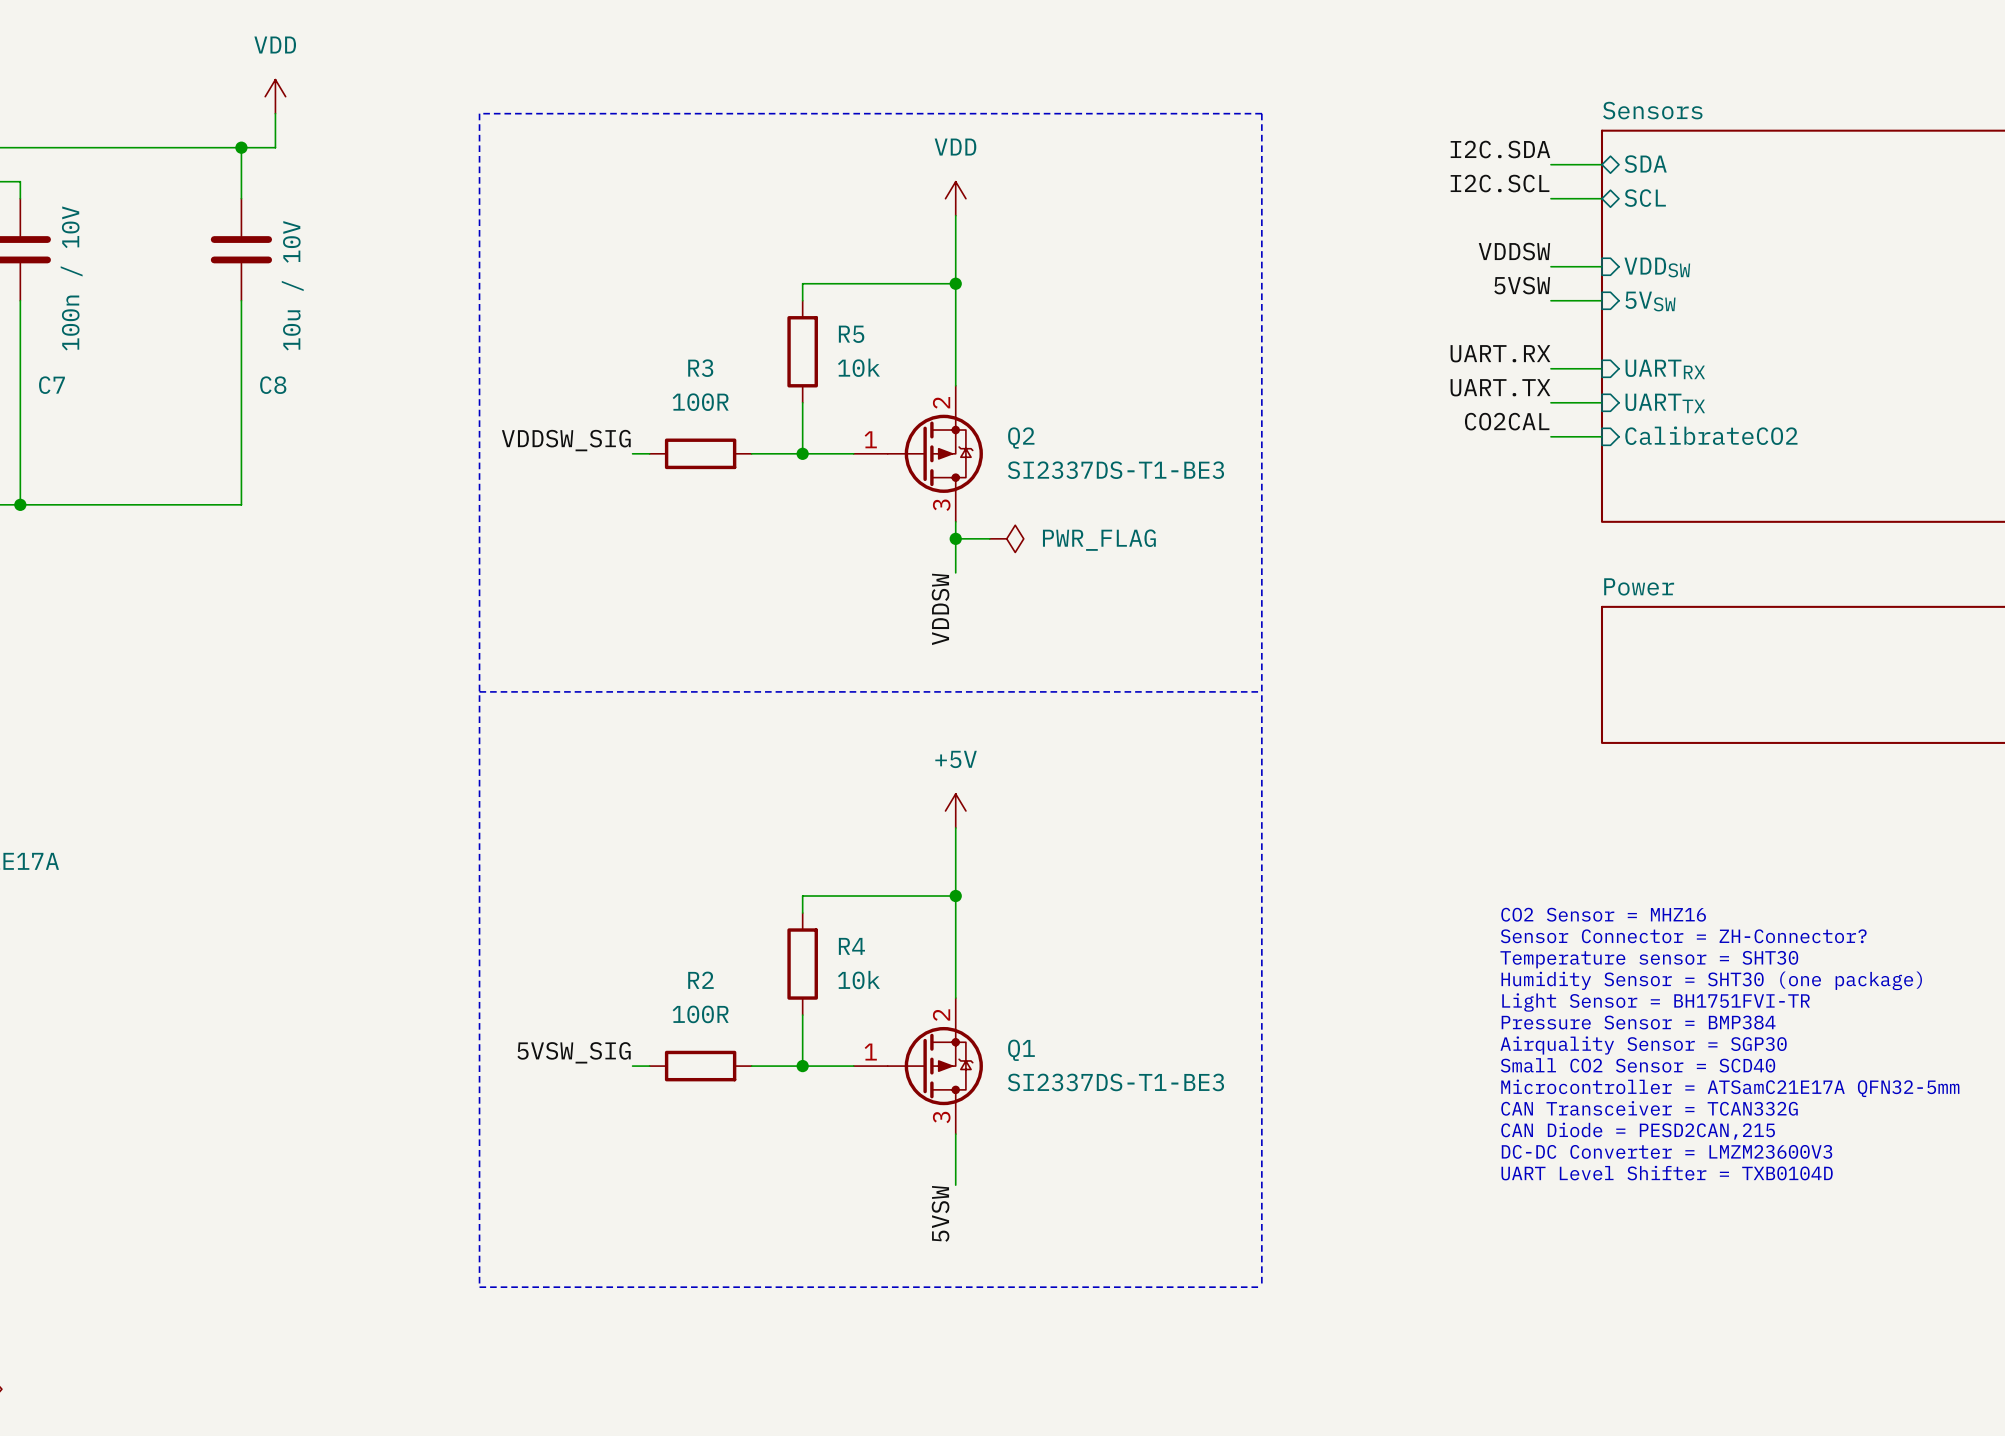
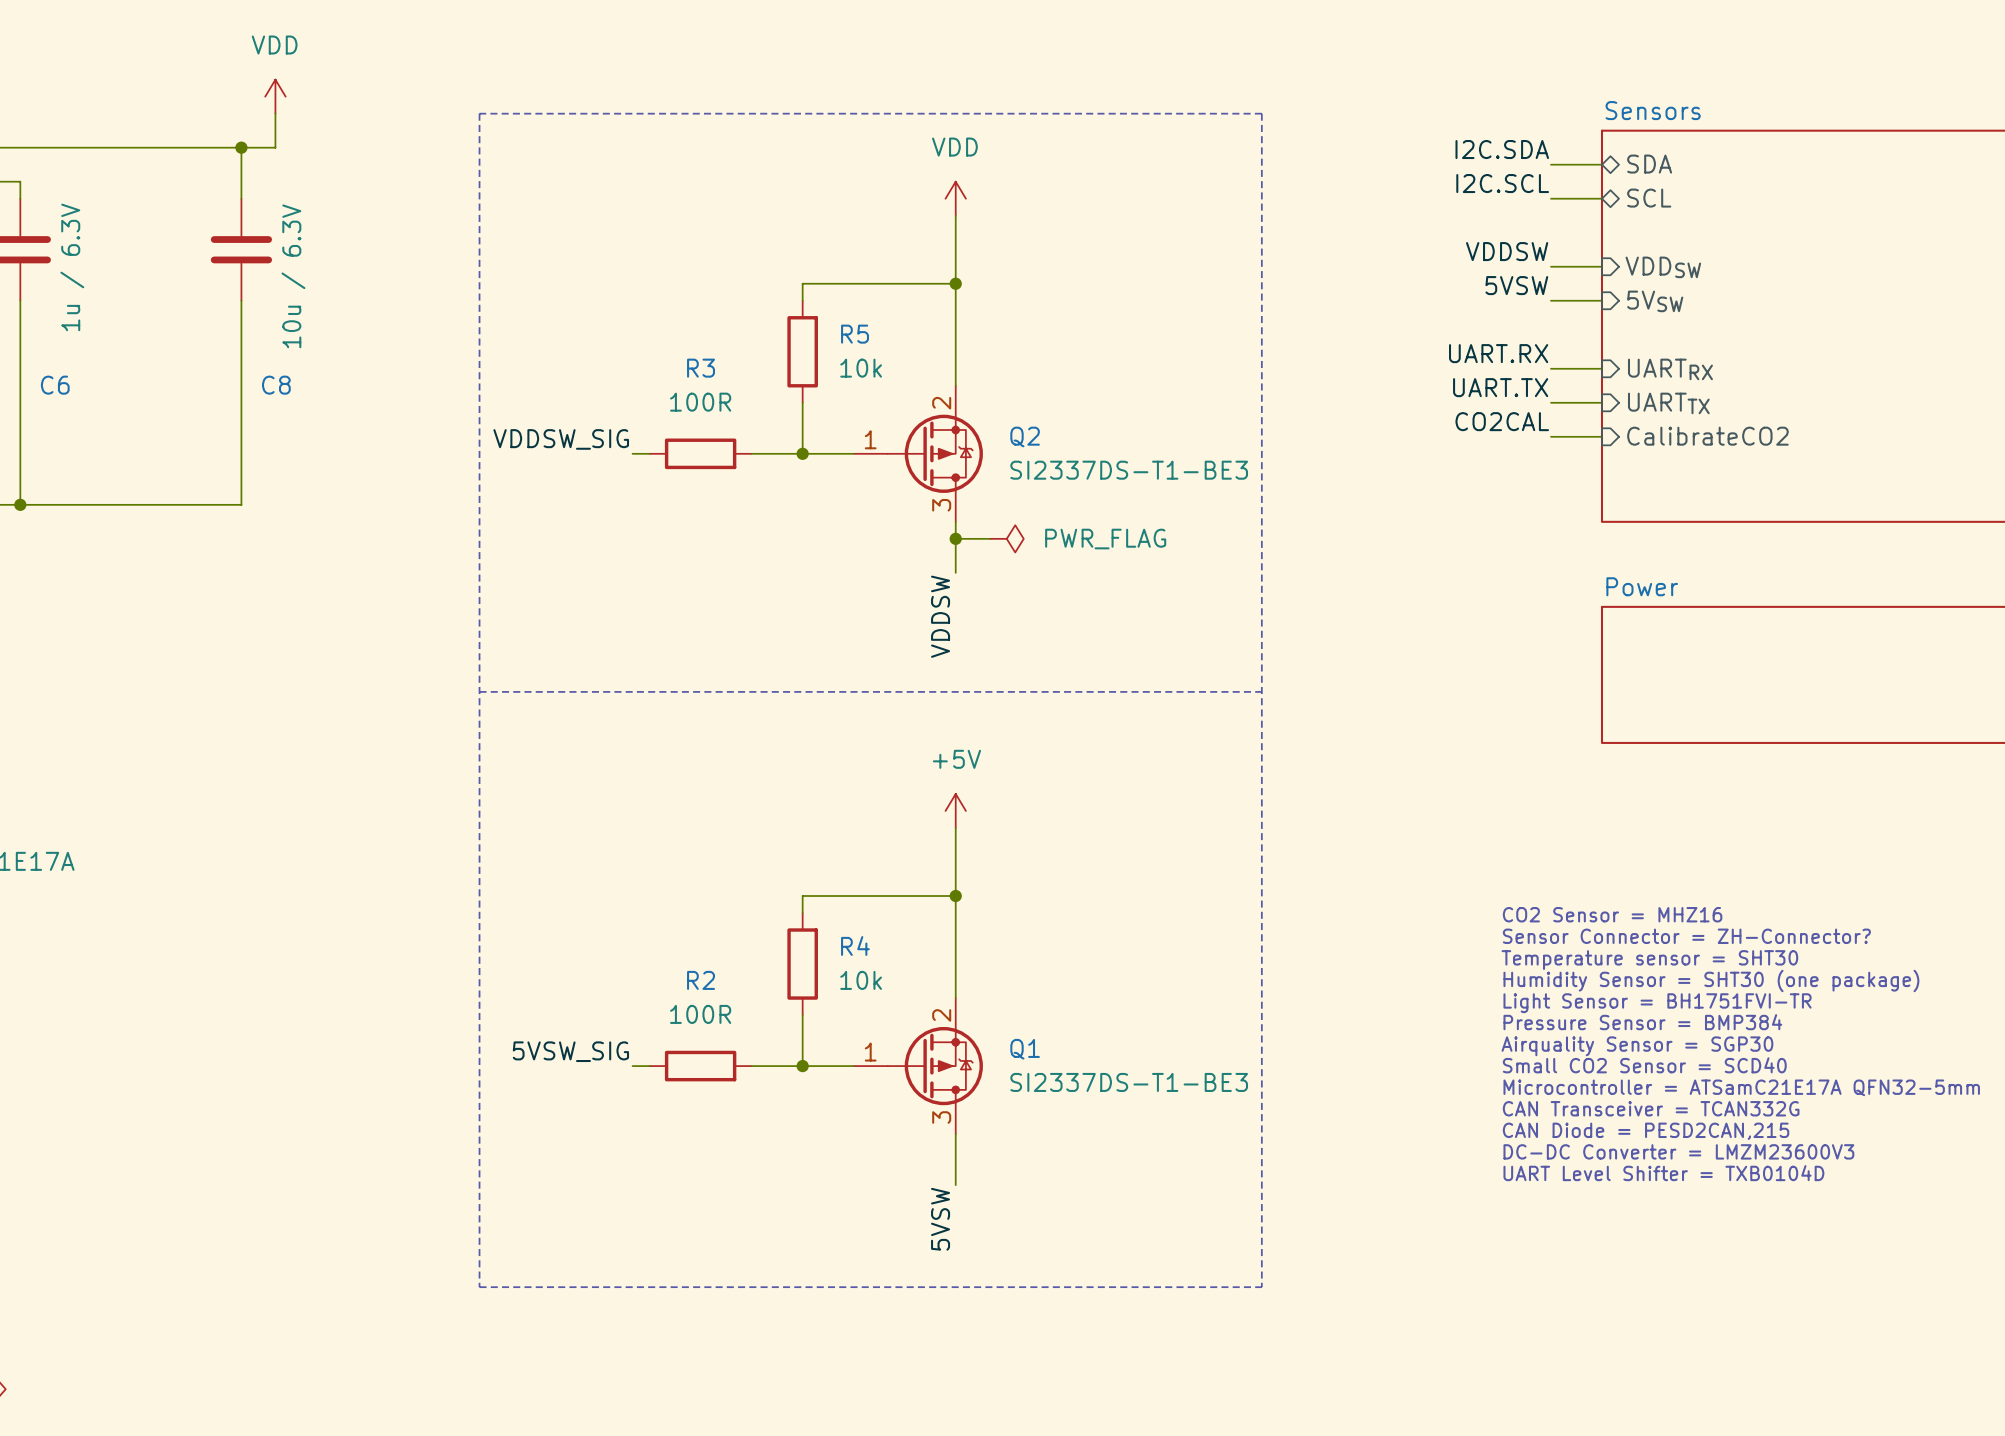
C7 value: 100n / 10V (71, 278) -> 1u / 6.3V (72, 267)
C8 value: 10u / 10V (292, 285) -> 10u / 6.3V (293, 276)
C7 name: C7 (51, 385) -> C6 (55, 385)

